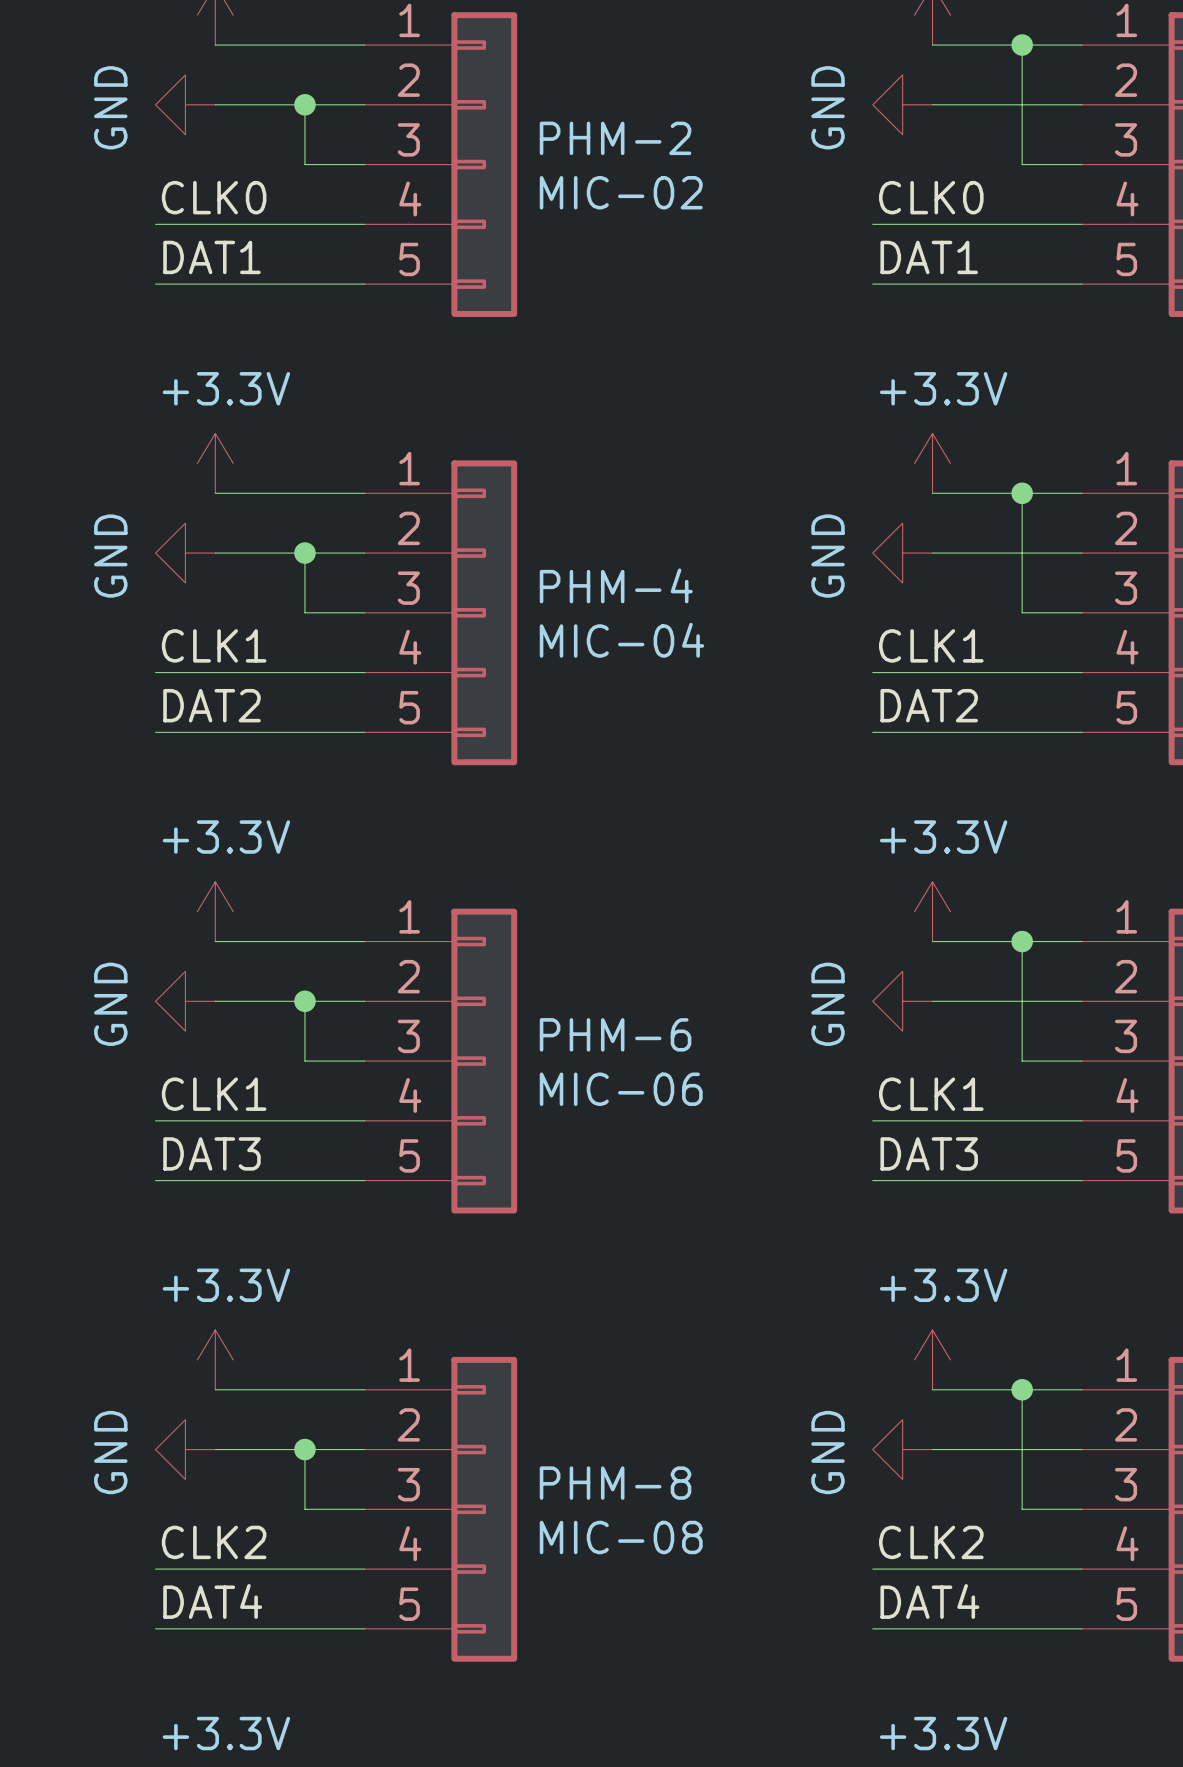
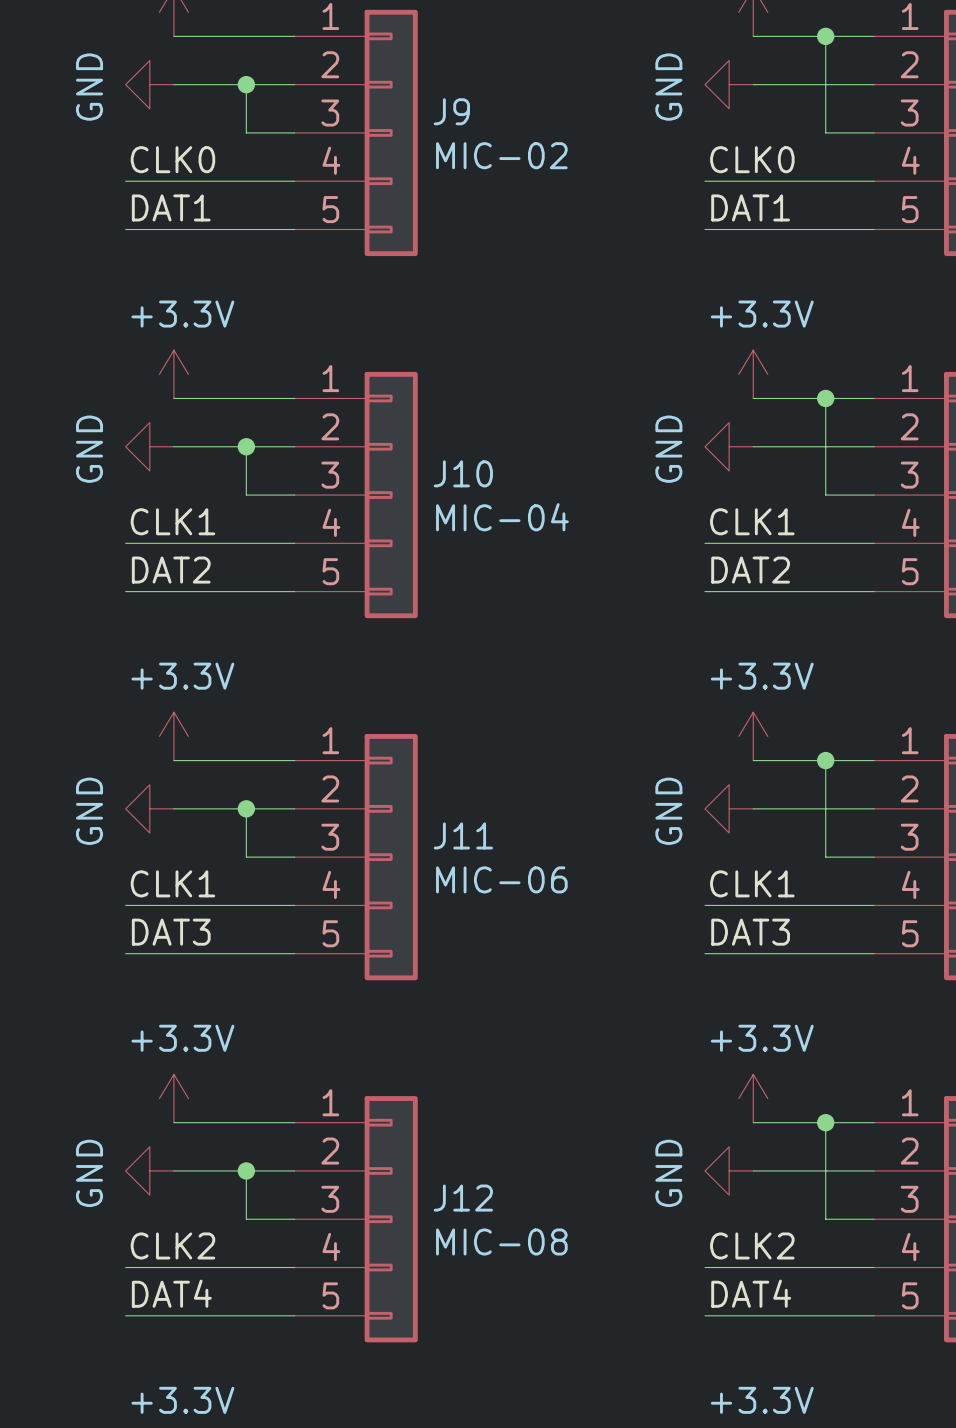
PHM-2 name: PHM-2 (615, 138) -> J9 (451, 111)
PHM-4 name: PHM-4 (616, 585) -> J10 (463, 473)
PHM-6 name: PHM-6 (615, 1034) -> J11 (463, 835)
PHM-8 name: PHM-8 (615, 1483) -> J12 (463, 1198)

